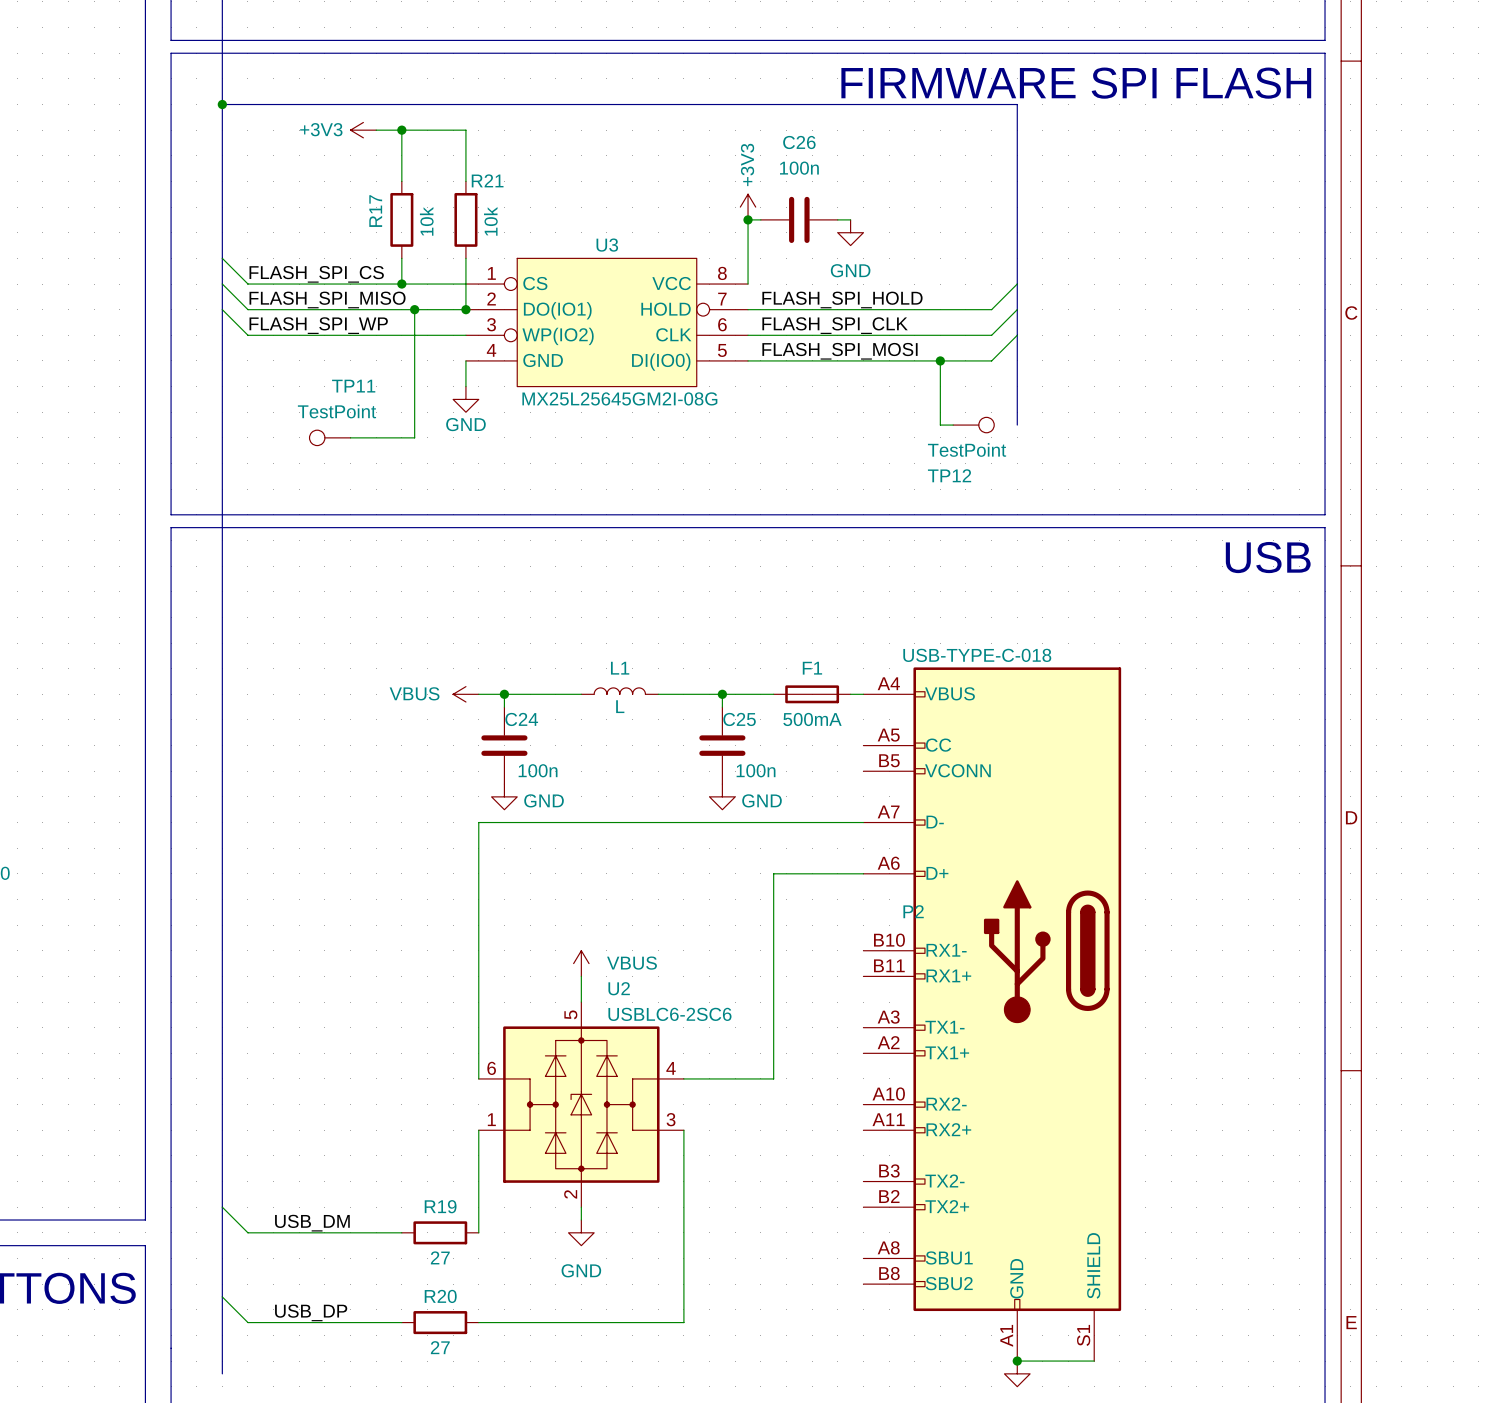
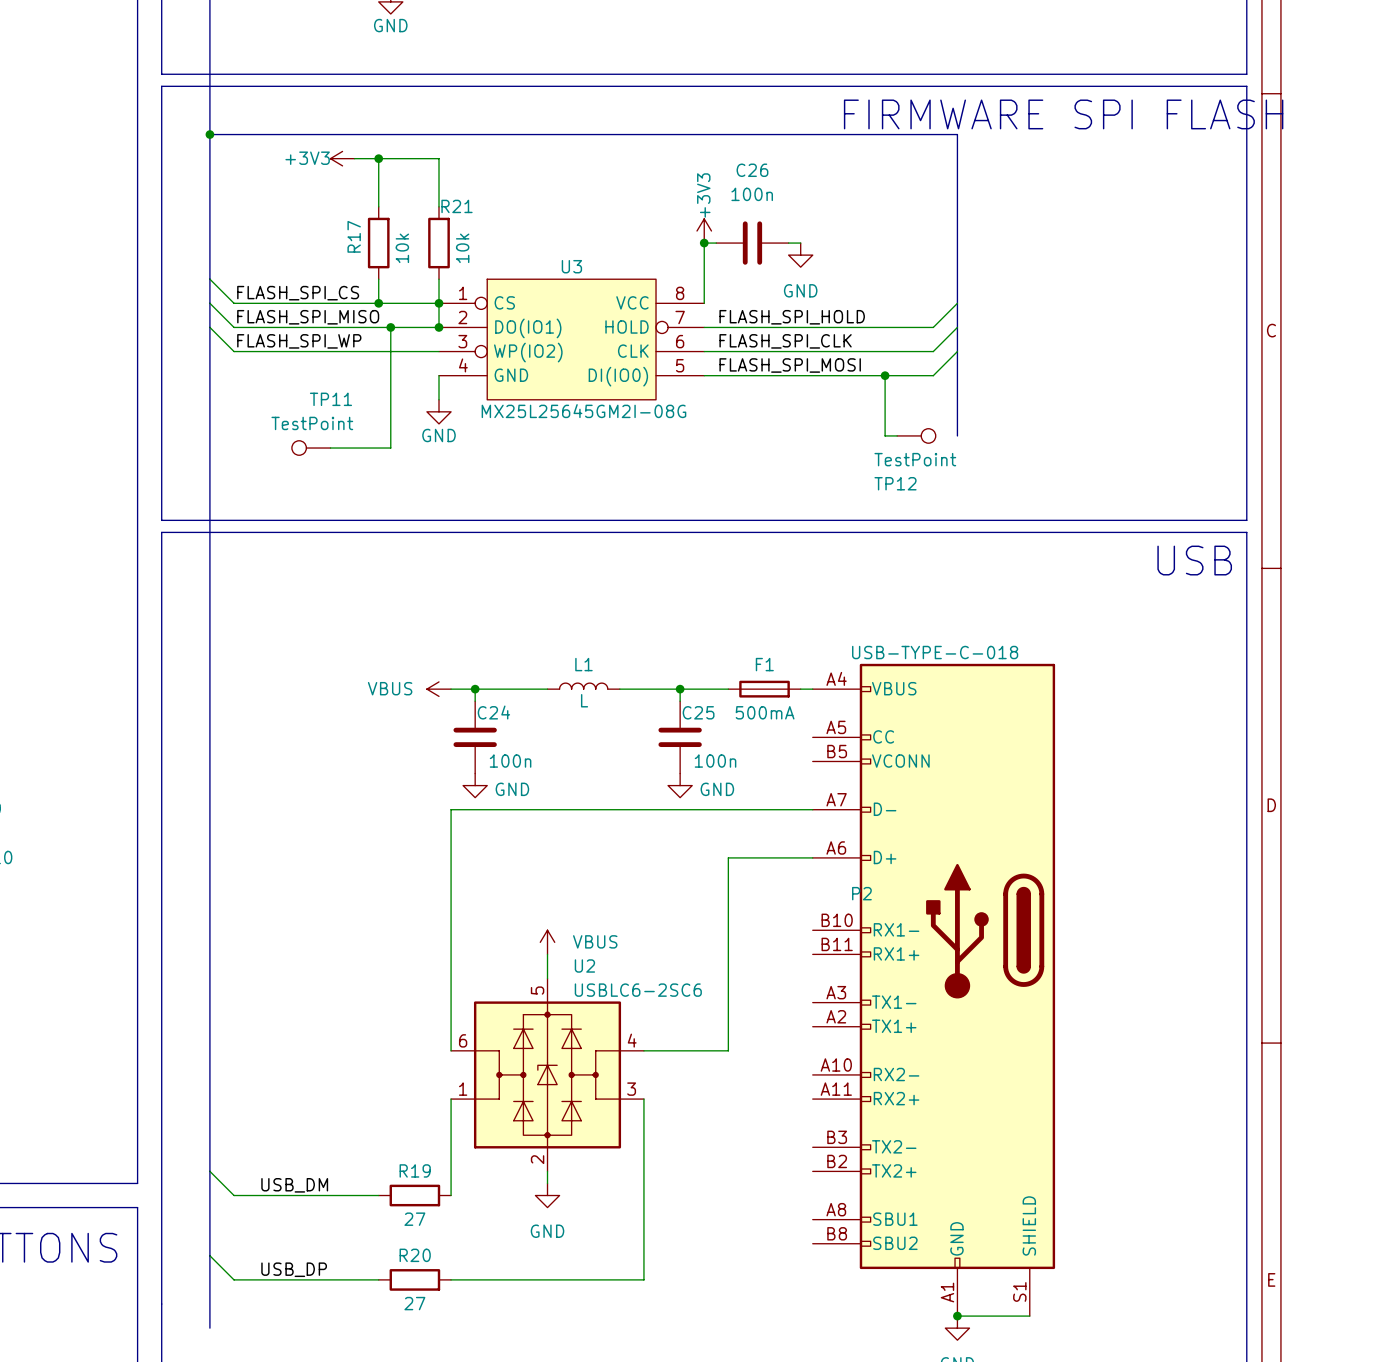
text position: FIRMWARE SPI FLASH (1076, 83) -> FIRMWARE SPI FLASH (1063, 114)
junction: none -> (439, 303)

